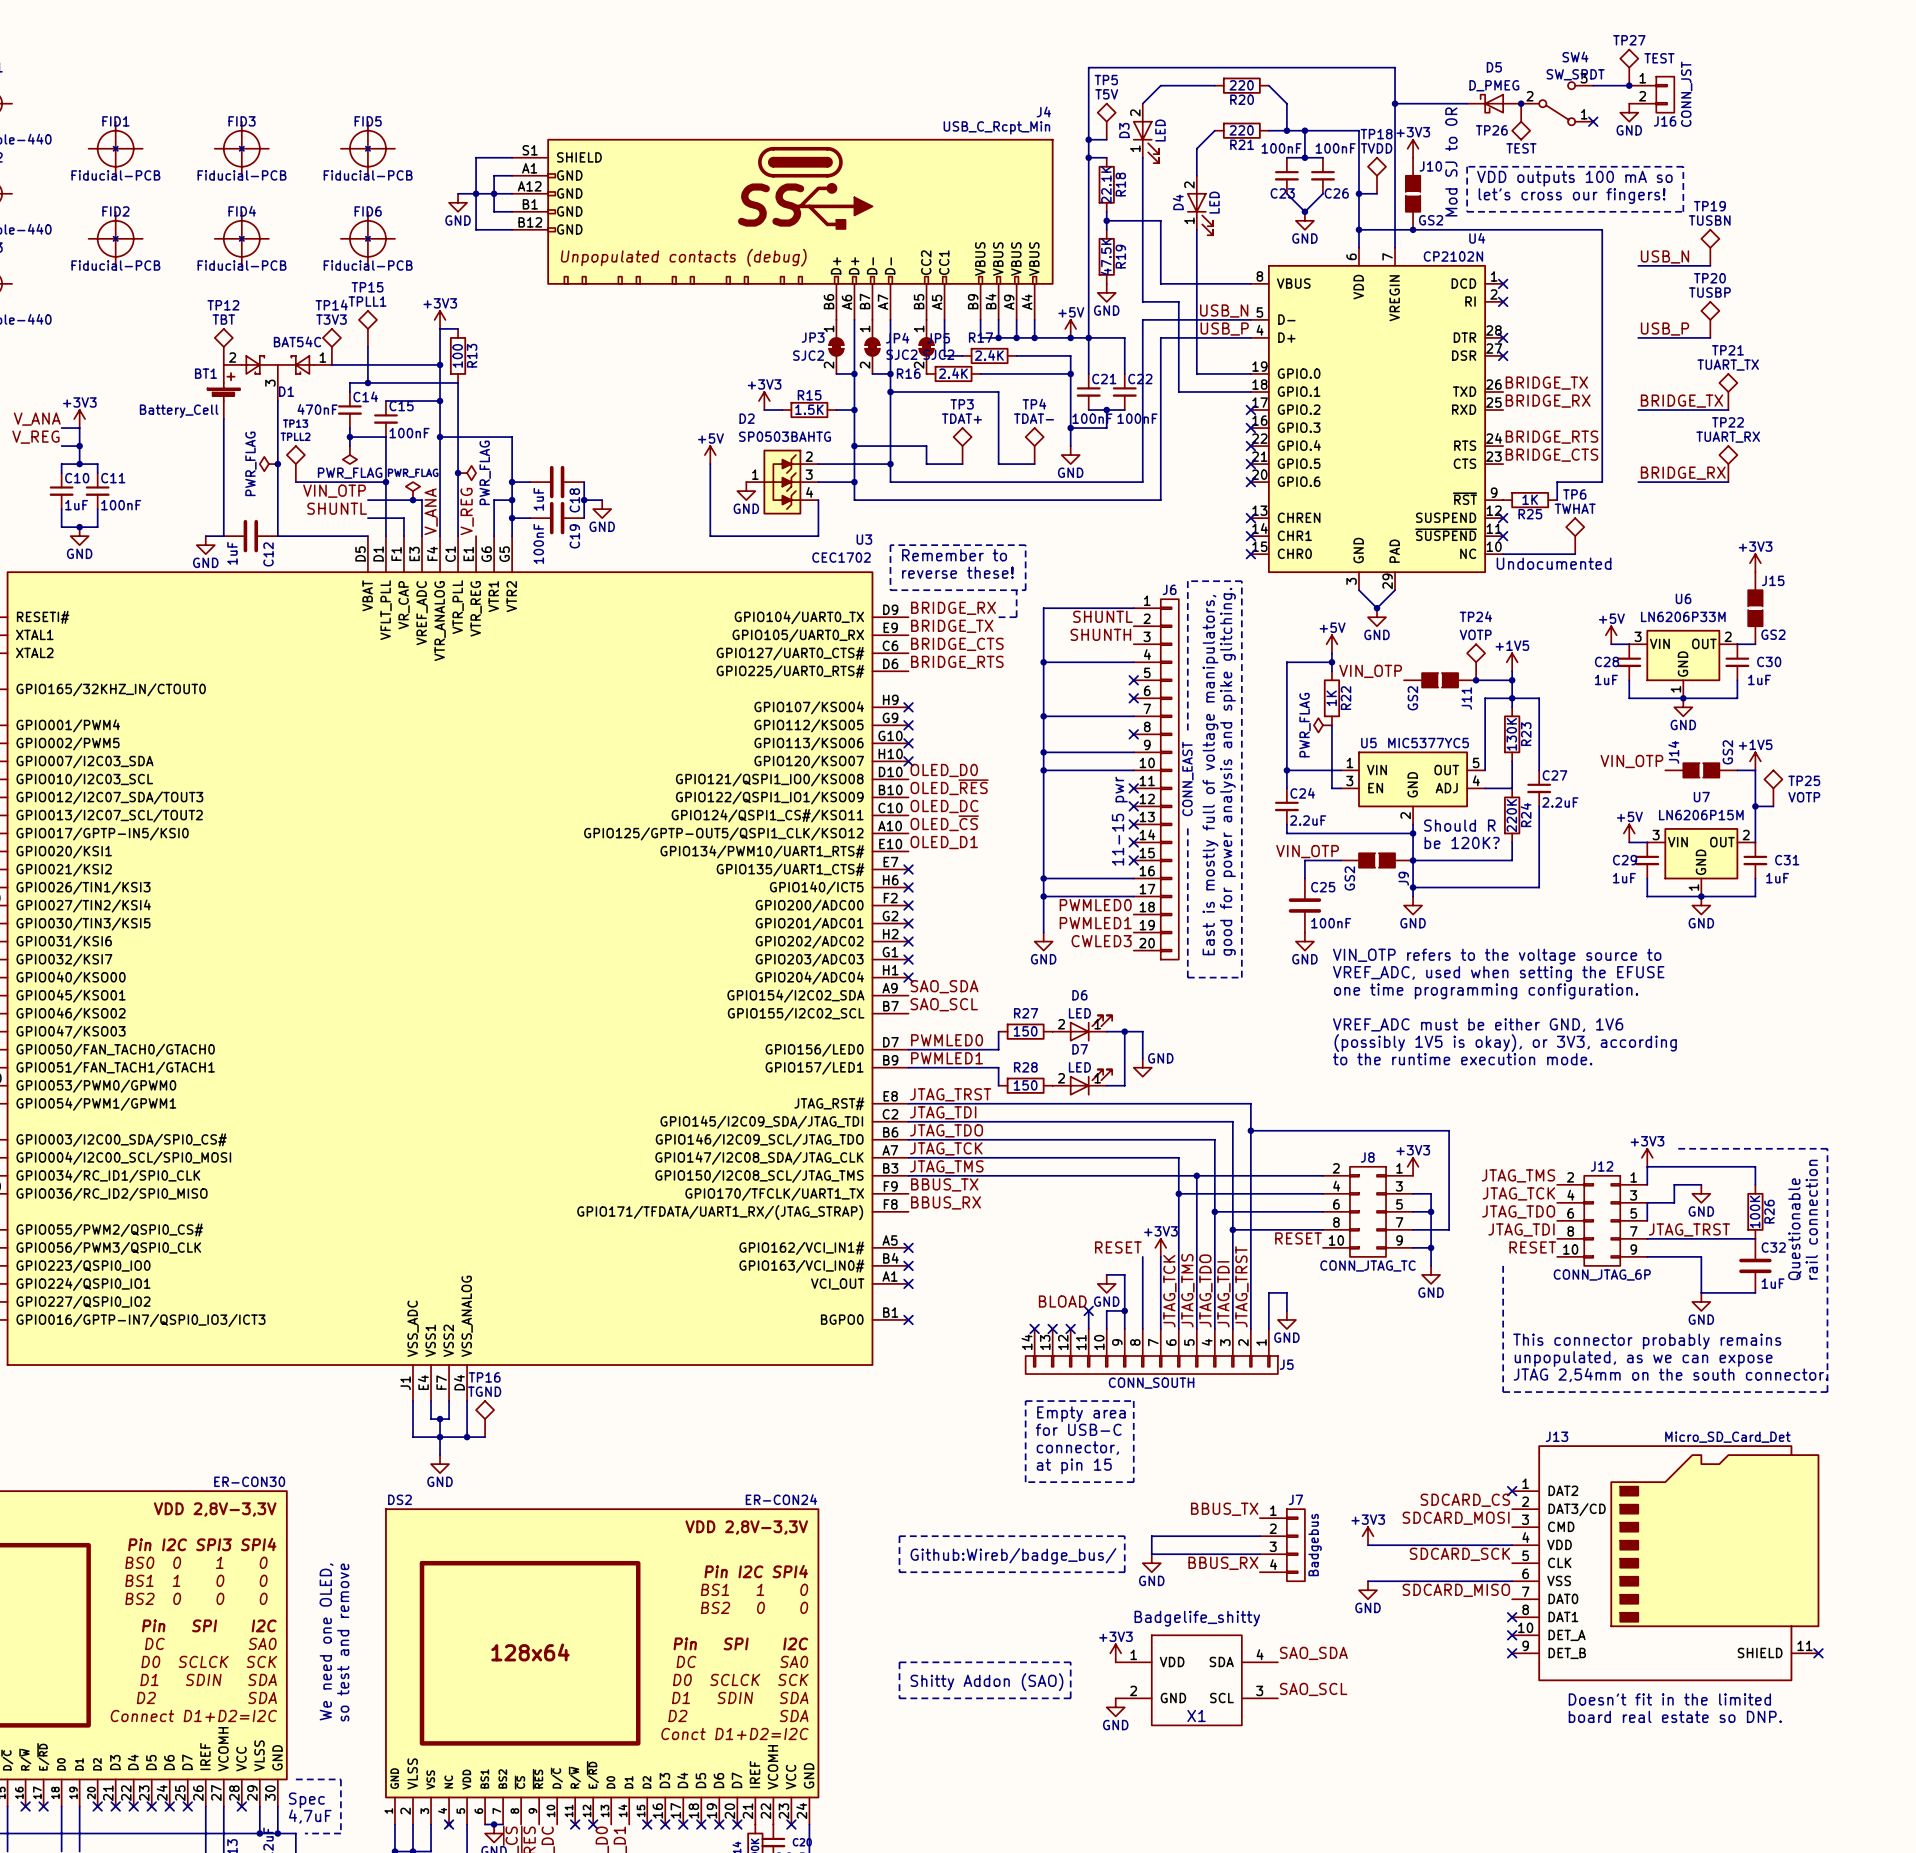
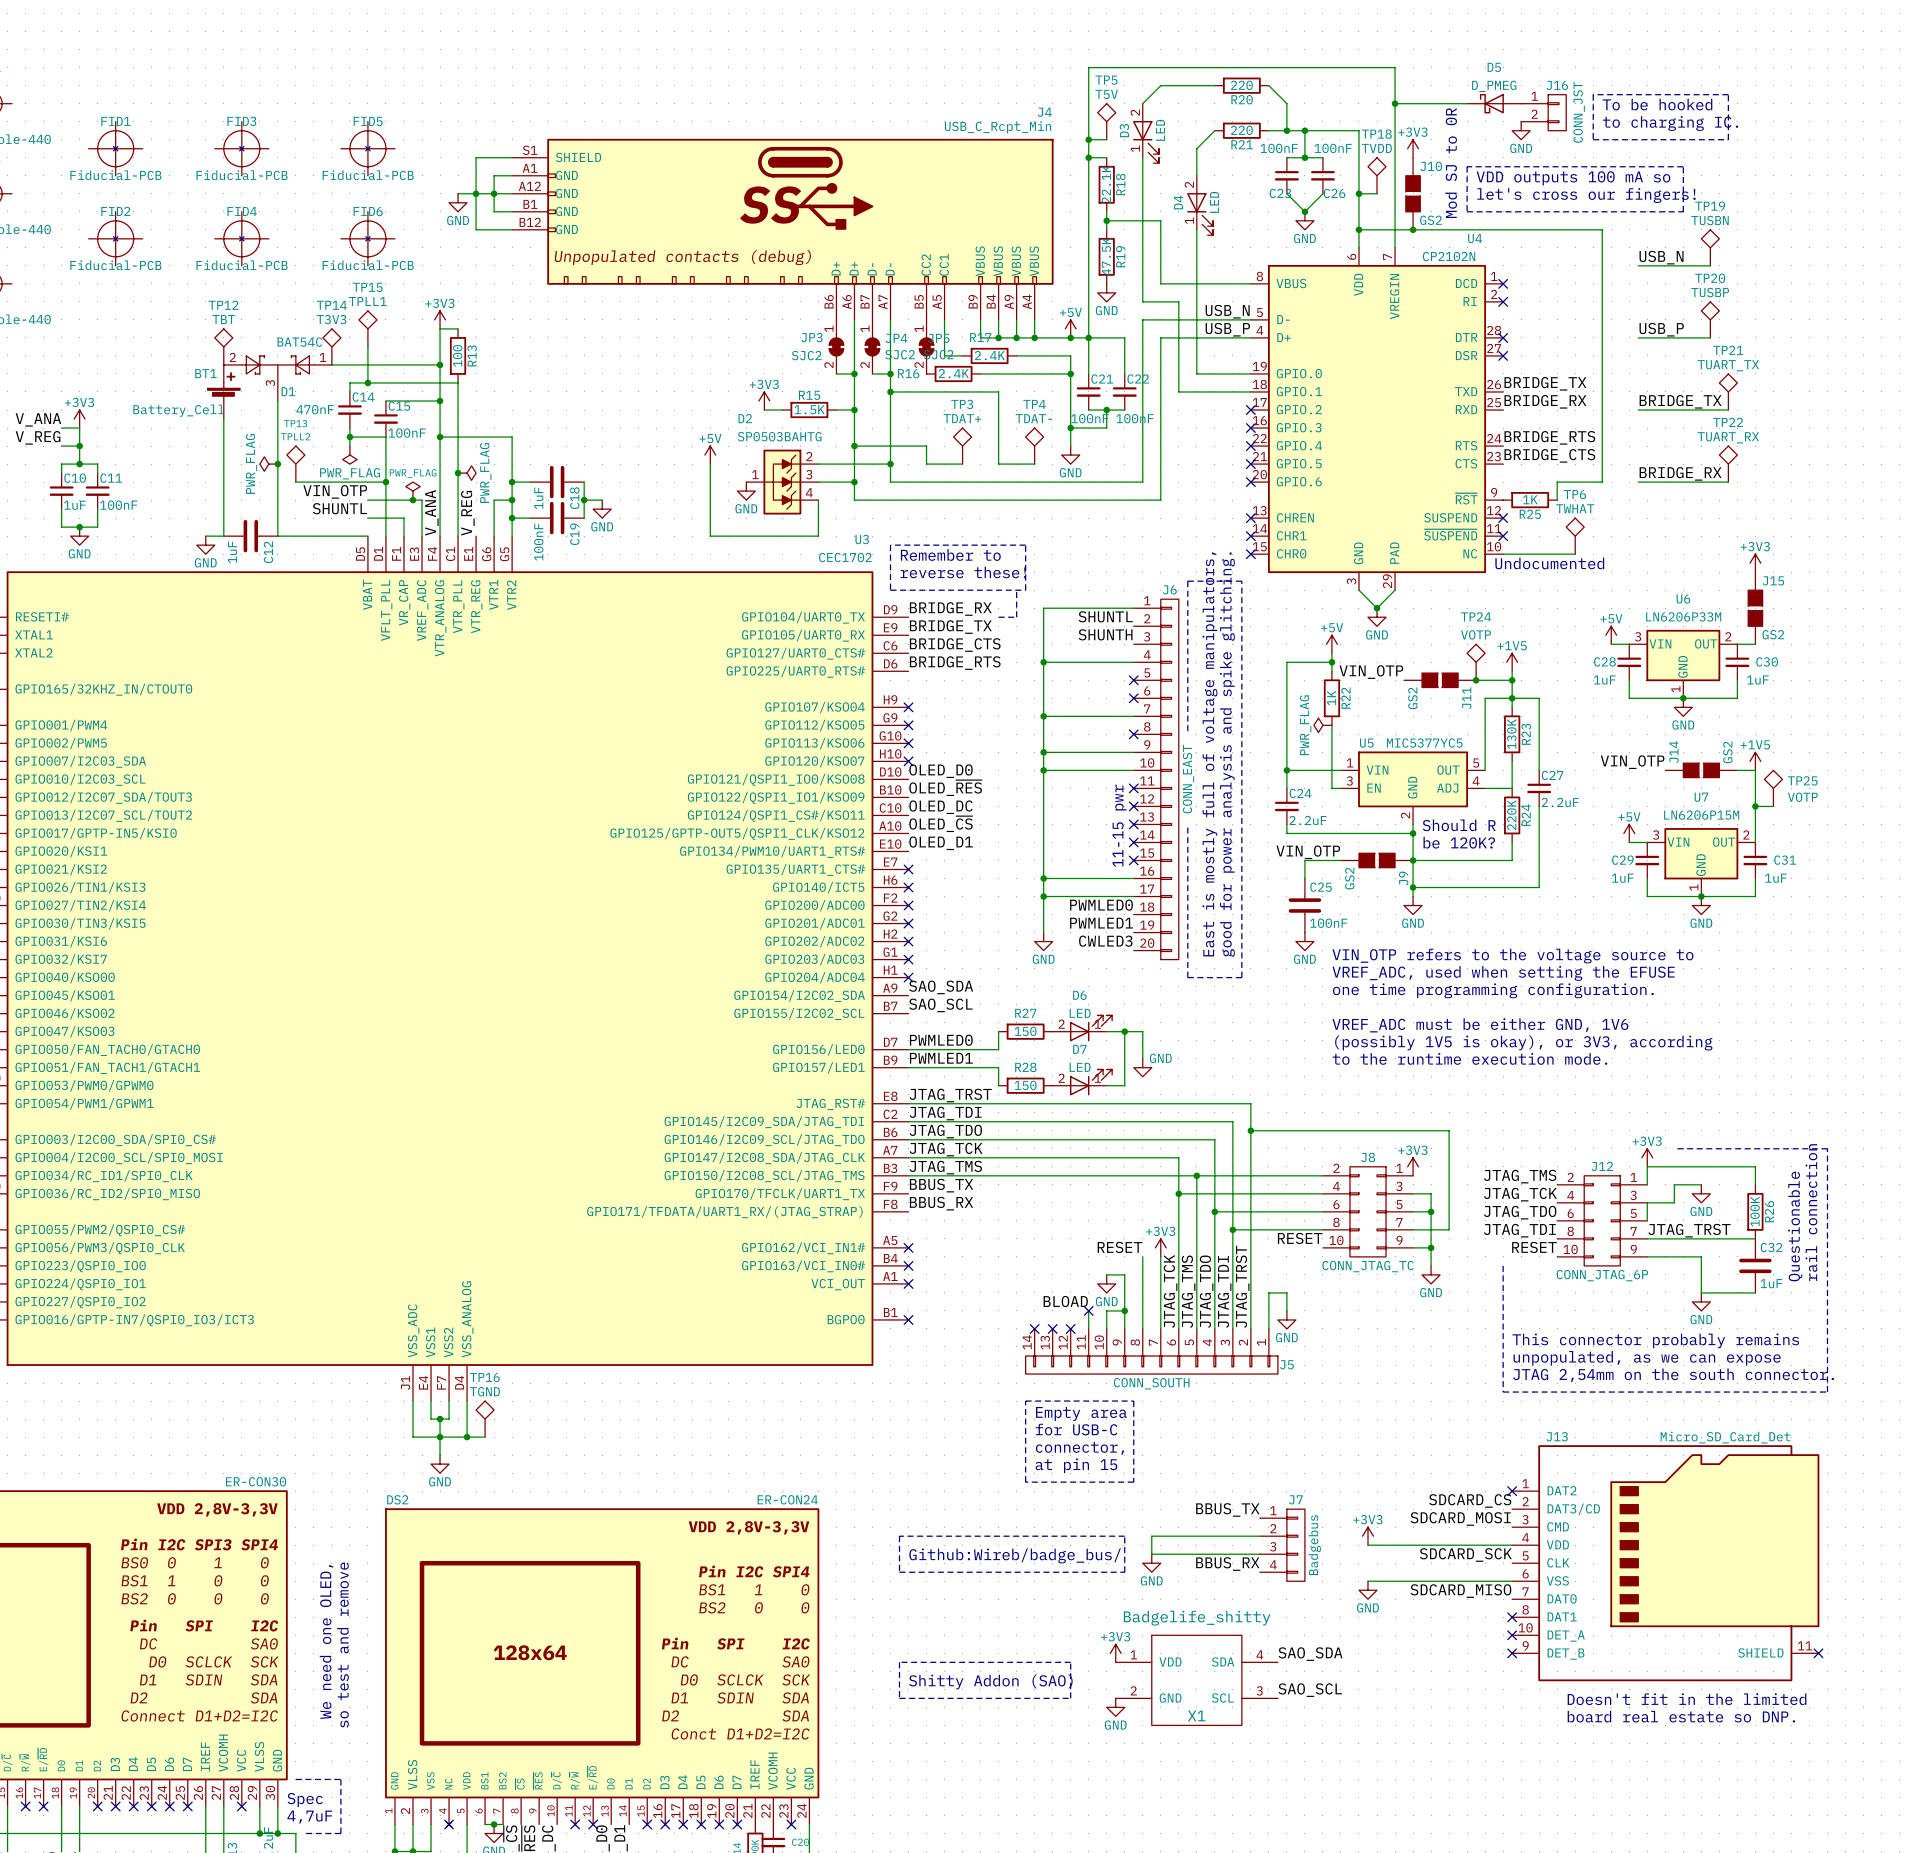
TP27: TEST (1629, 67) -> none
wire: (1593, 85) (1629, 85) -> none
junction: (1629, 85) -> none
line: none -> (1593, 94) (1593, 139) (1728, 139) (1728, 94) (1593, 94)
J16 position: (1651, 94) -> (1543, 112)
junction: (1521, 103) -> none
SW4: SW_SPDT (1557, 103) -> none
text: none -> To be hooked (1657, 104)
power symbol position: GND (1629, 112) -> GND (1521, 130)
TP26: TEST (1521, 121) -> none
no-connect mark: (1593, 121) -> none
J16 name position: J16 (1665, 121) -> J16 (1557, 85)
text: none -> to charging IC. (1670, 123)

